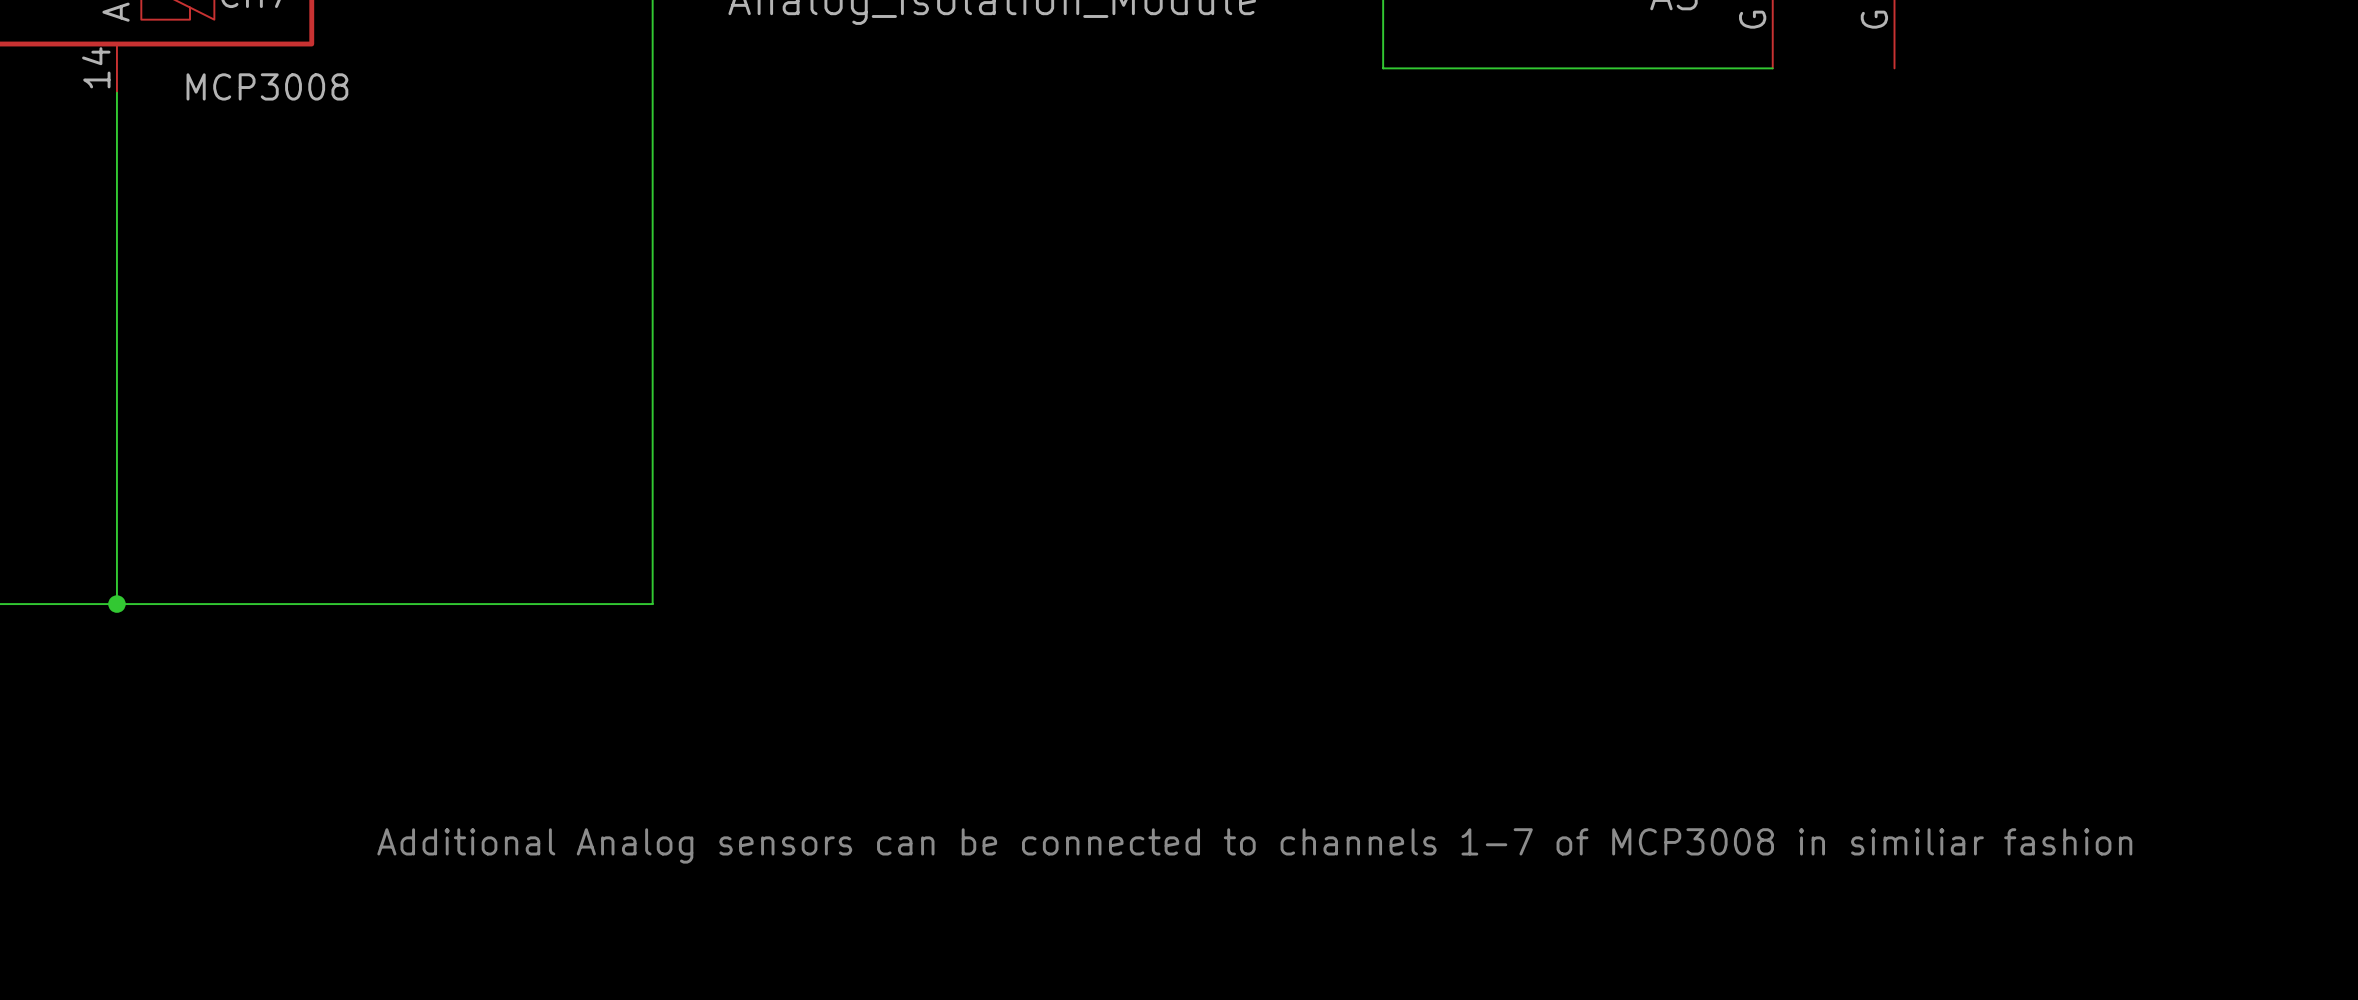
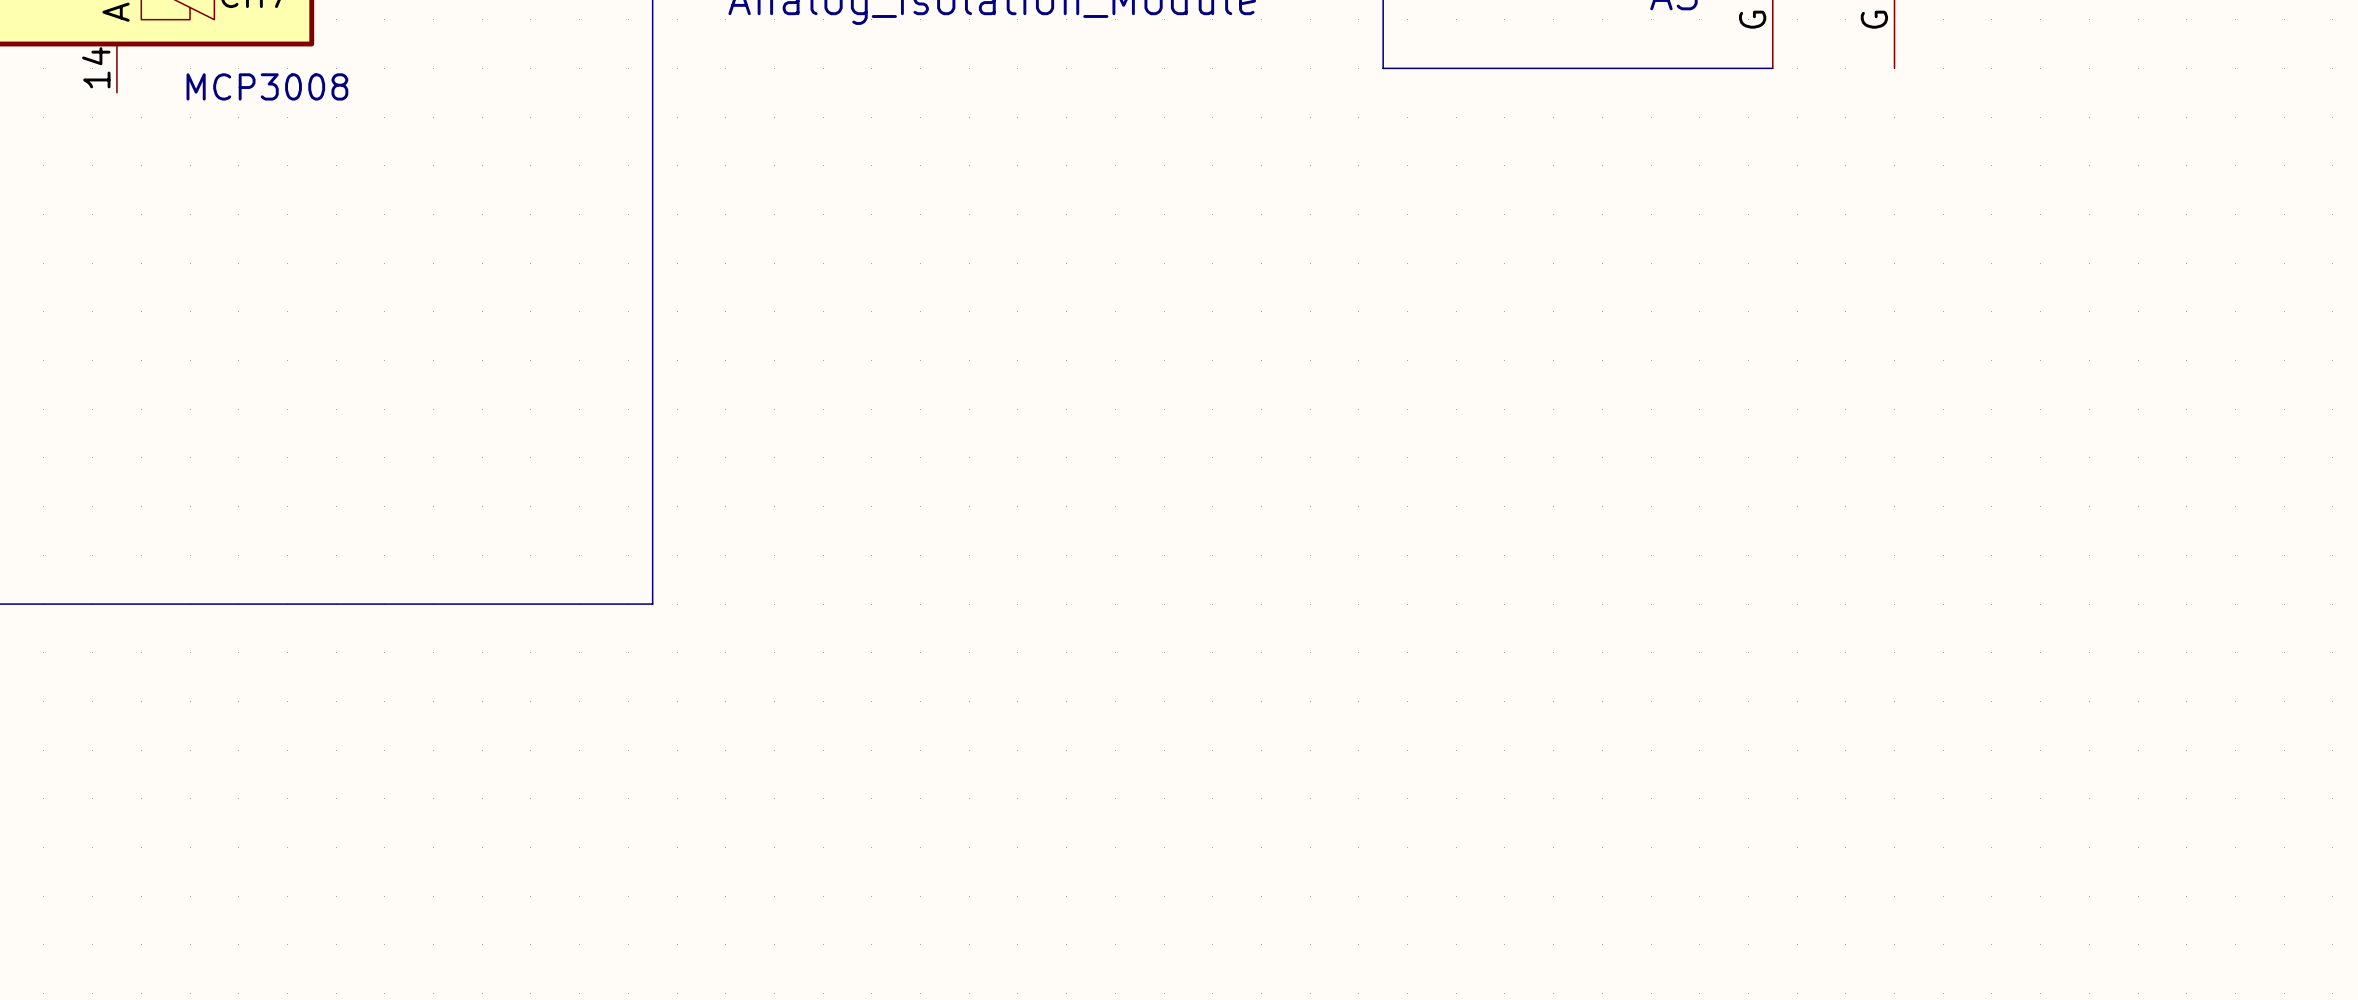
wire: (116, 92) (116, 604) -> none
junction: (116, 604) -> none
text: Additional Analog sensors can be connected to channels 1-7 of MCP3008 in similiar fashion (1254, 845) -> none

